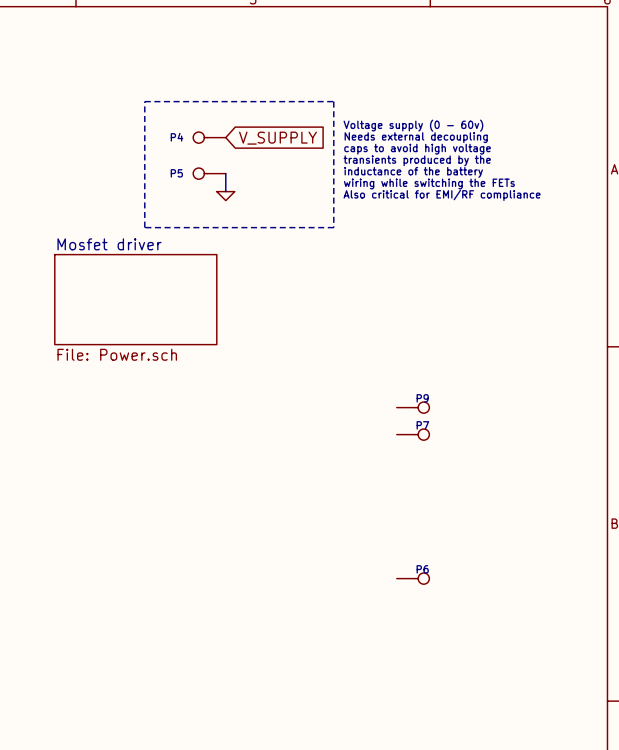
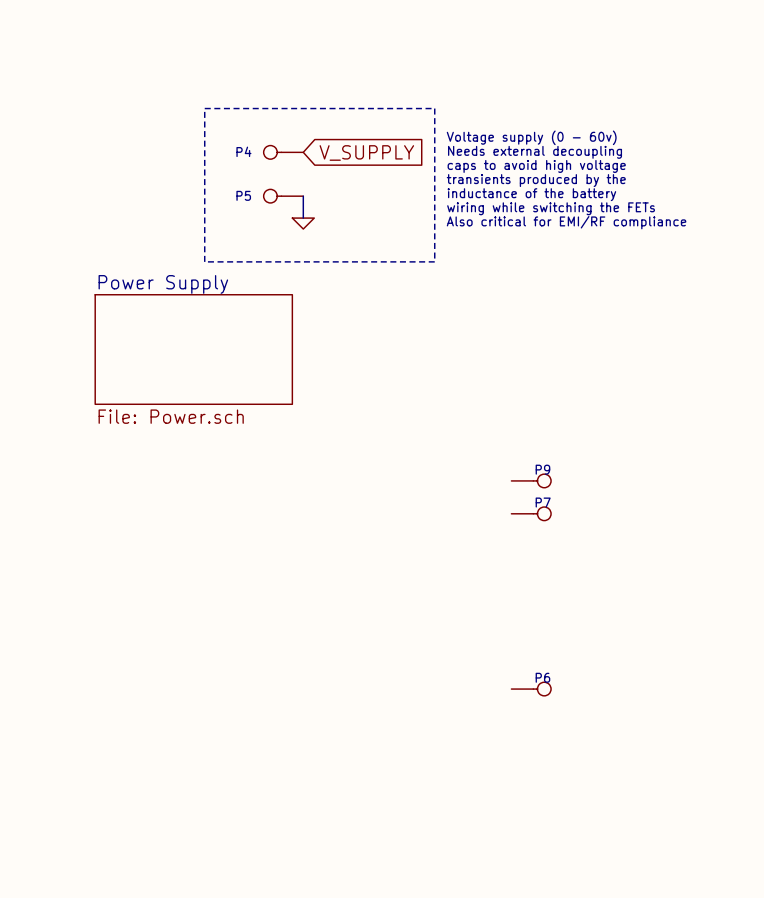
sheet Mosfet driver name: Mosfet driver (109, 244) -> Power Supply (163, 284)

